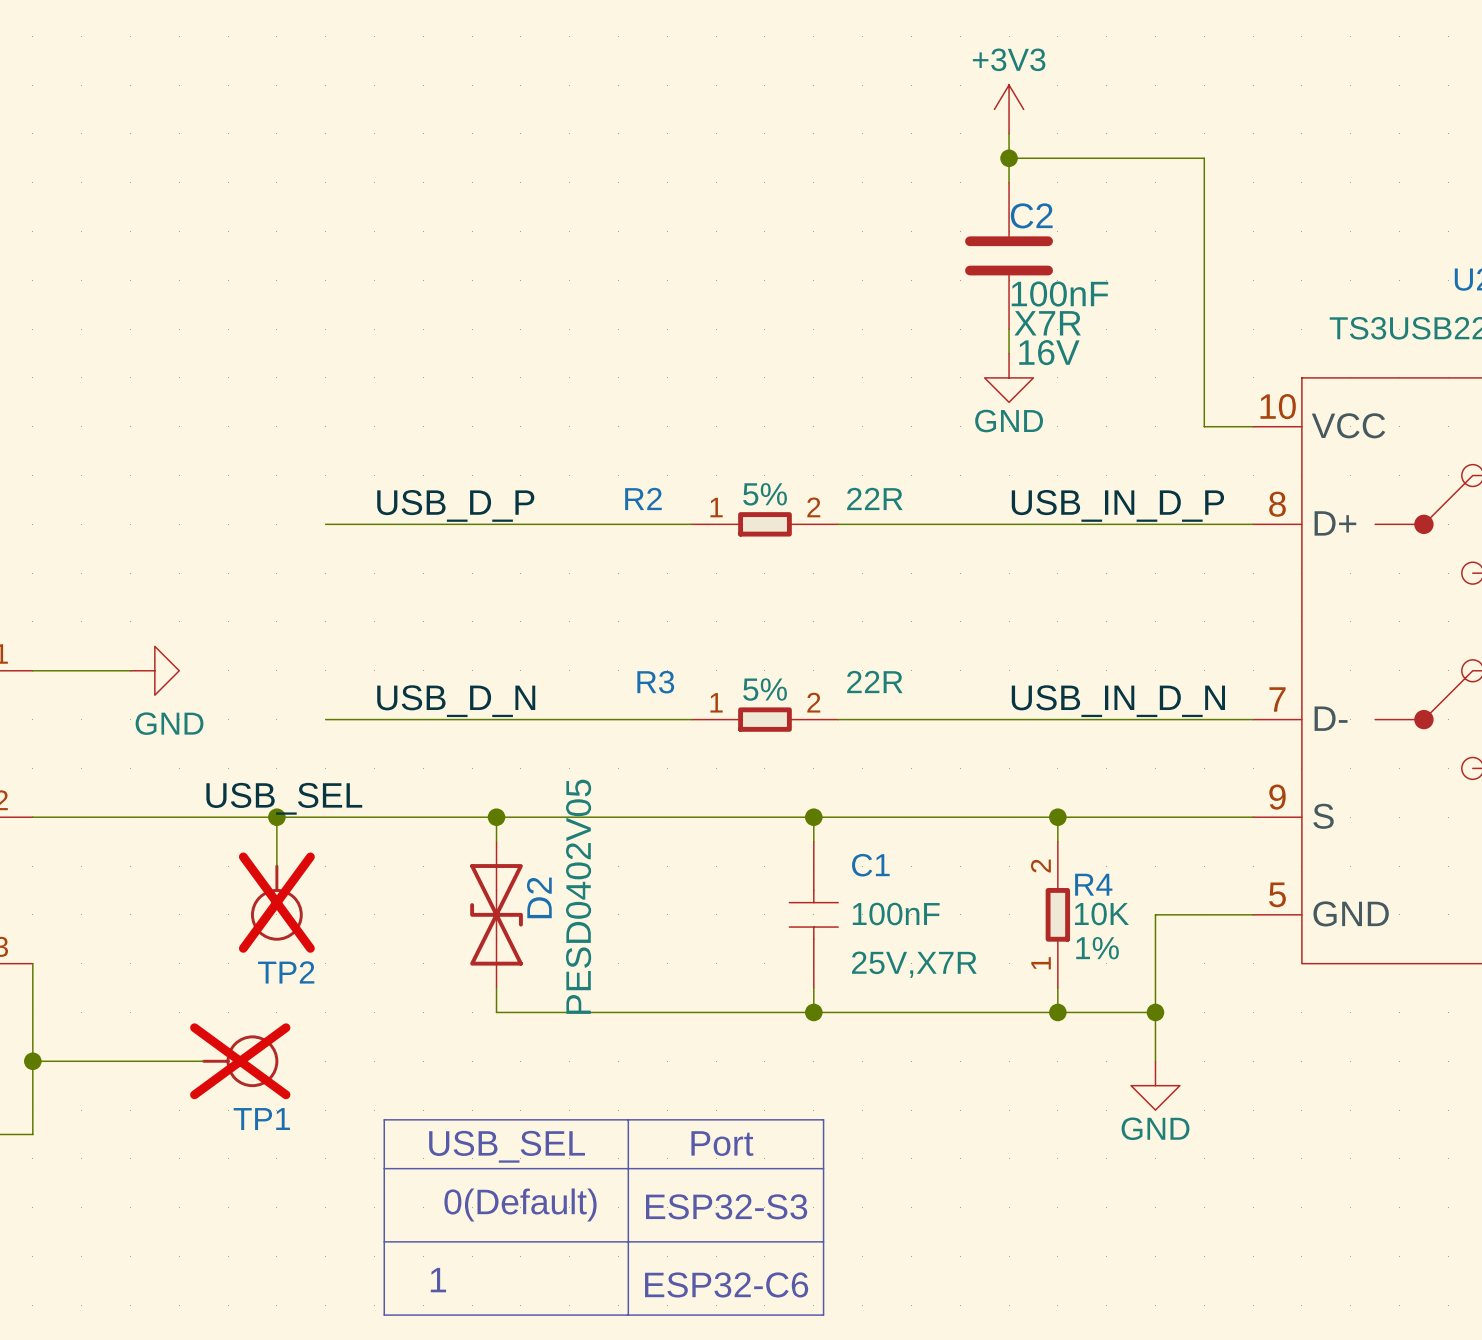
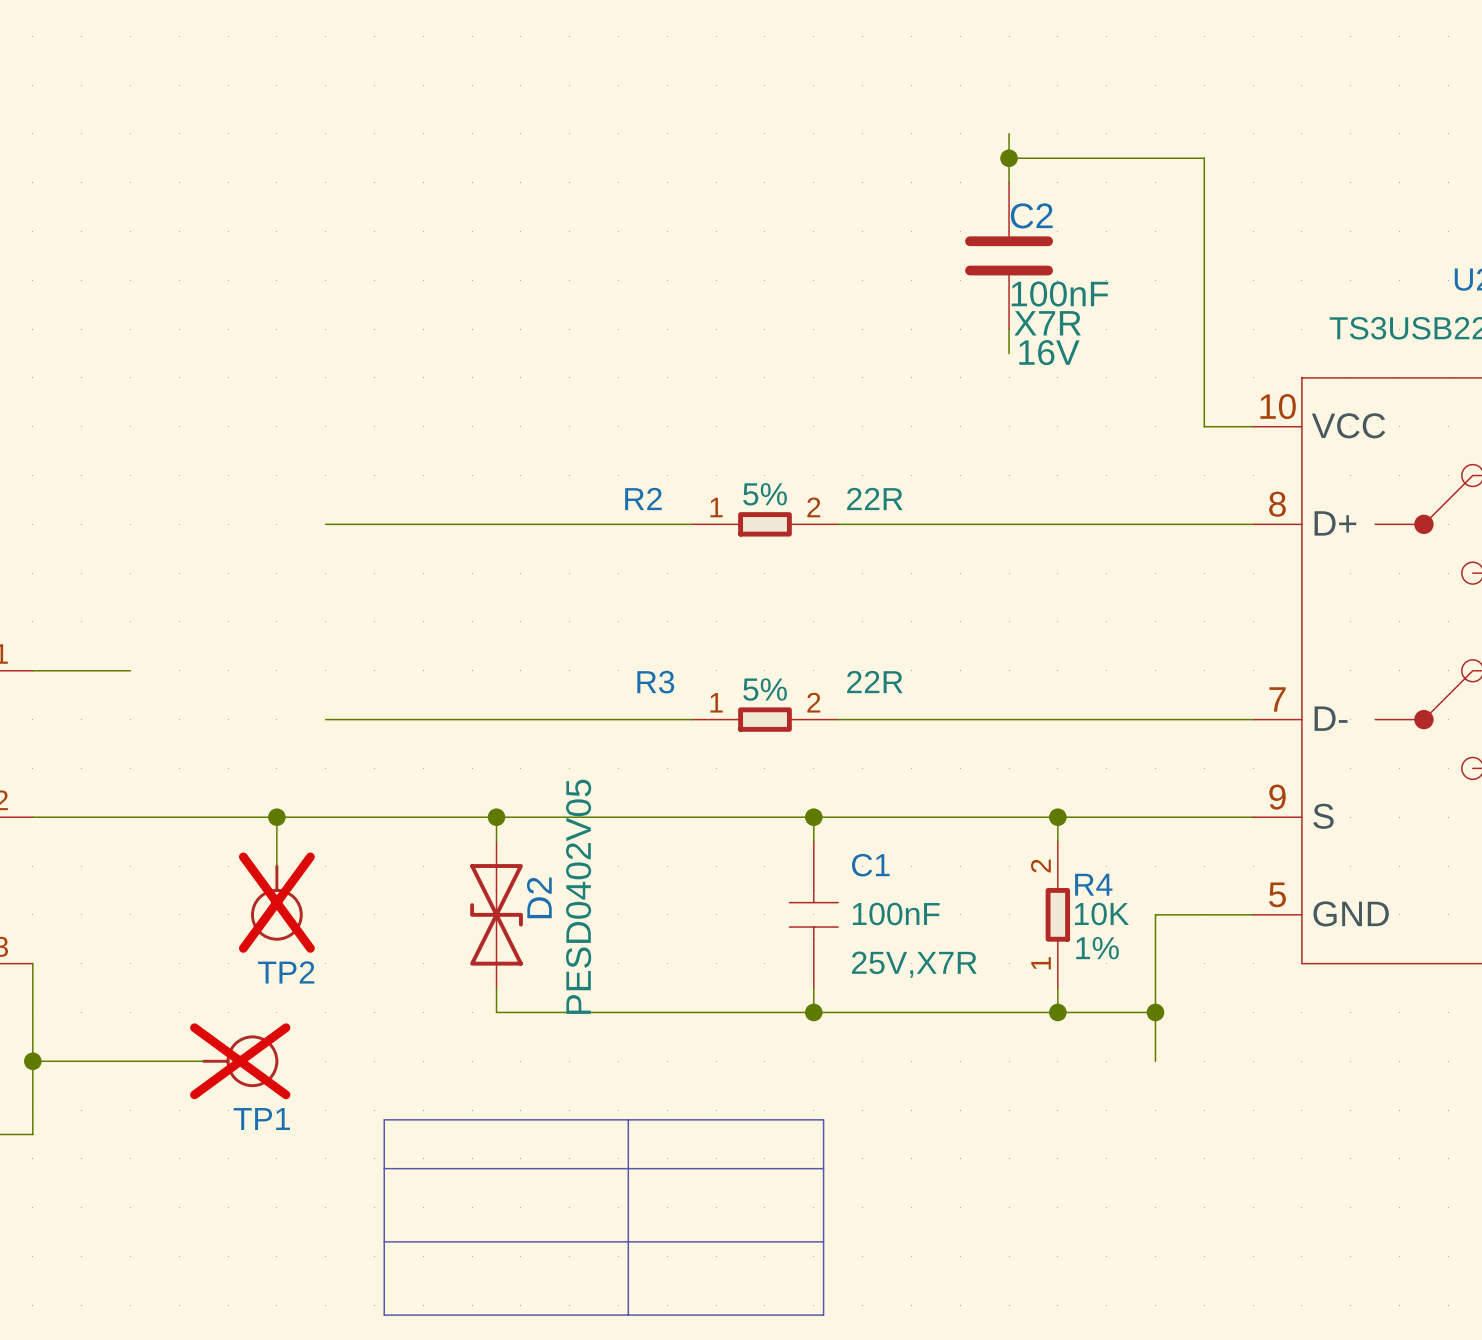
power symbol: +3V3 (1009, 109) -> none
power symbol: GND (1009, 377) -> none
label: USB_D_P (455, 505) -> none
label: USB_IN_D_P (1117, 505) -> none
power symbol: GND (154, 670) -> none
label: USB_D_N (456, 701) -> none
label: USB_IN_D_N (1118, 701) -> none
label: USB_SEL (284, 798) -> none
power symbol: GND (1155, 1085) -> none
text: Port (722, 1143) -> none
text: USB_SEL (507, 1146) -> none
text: 0(Default) (520, 1205) -> none
text: ESP32-S3 (726, 1206) -> none
text: 1 (438, 1280) -> none
text: ESP32-C6 (726, 1284) -> none

